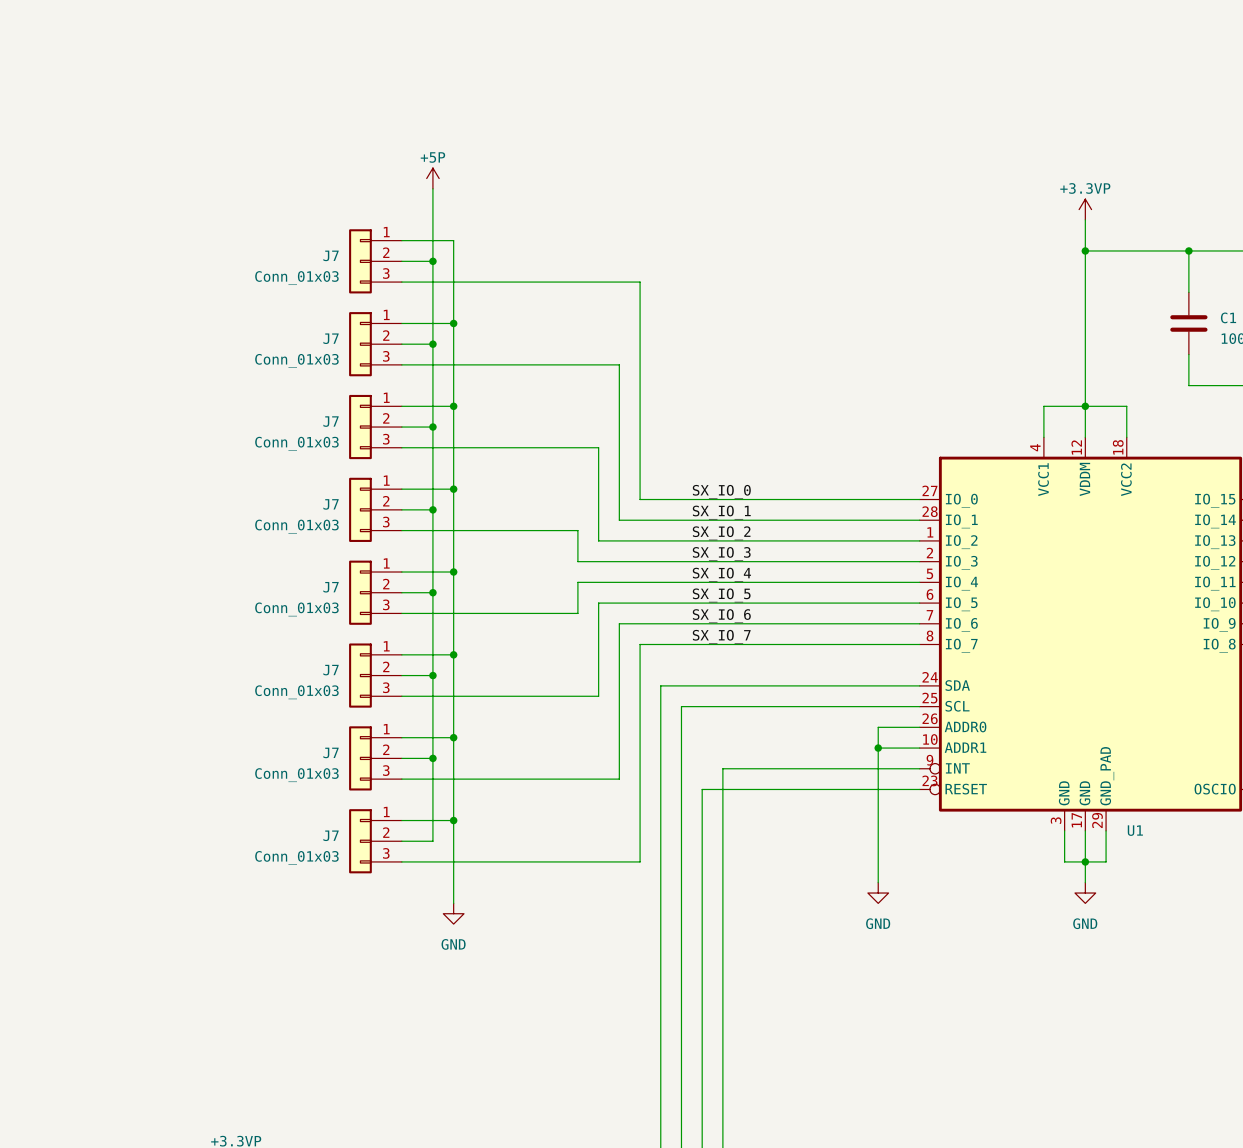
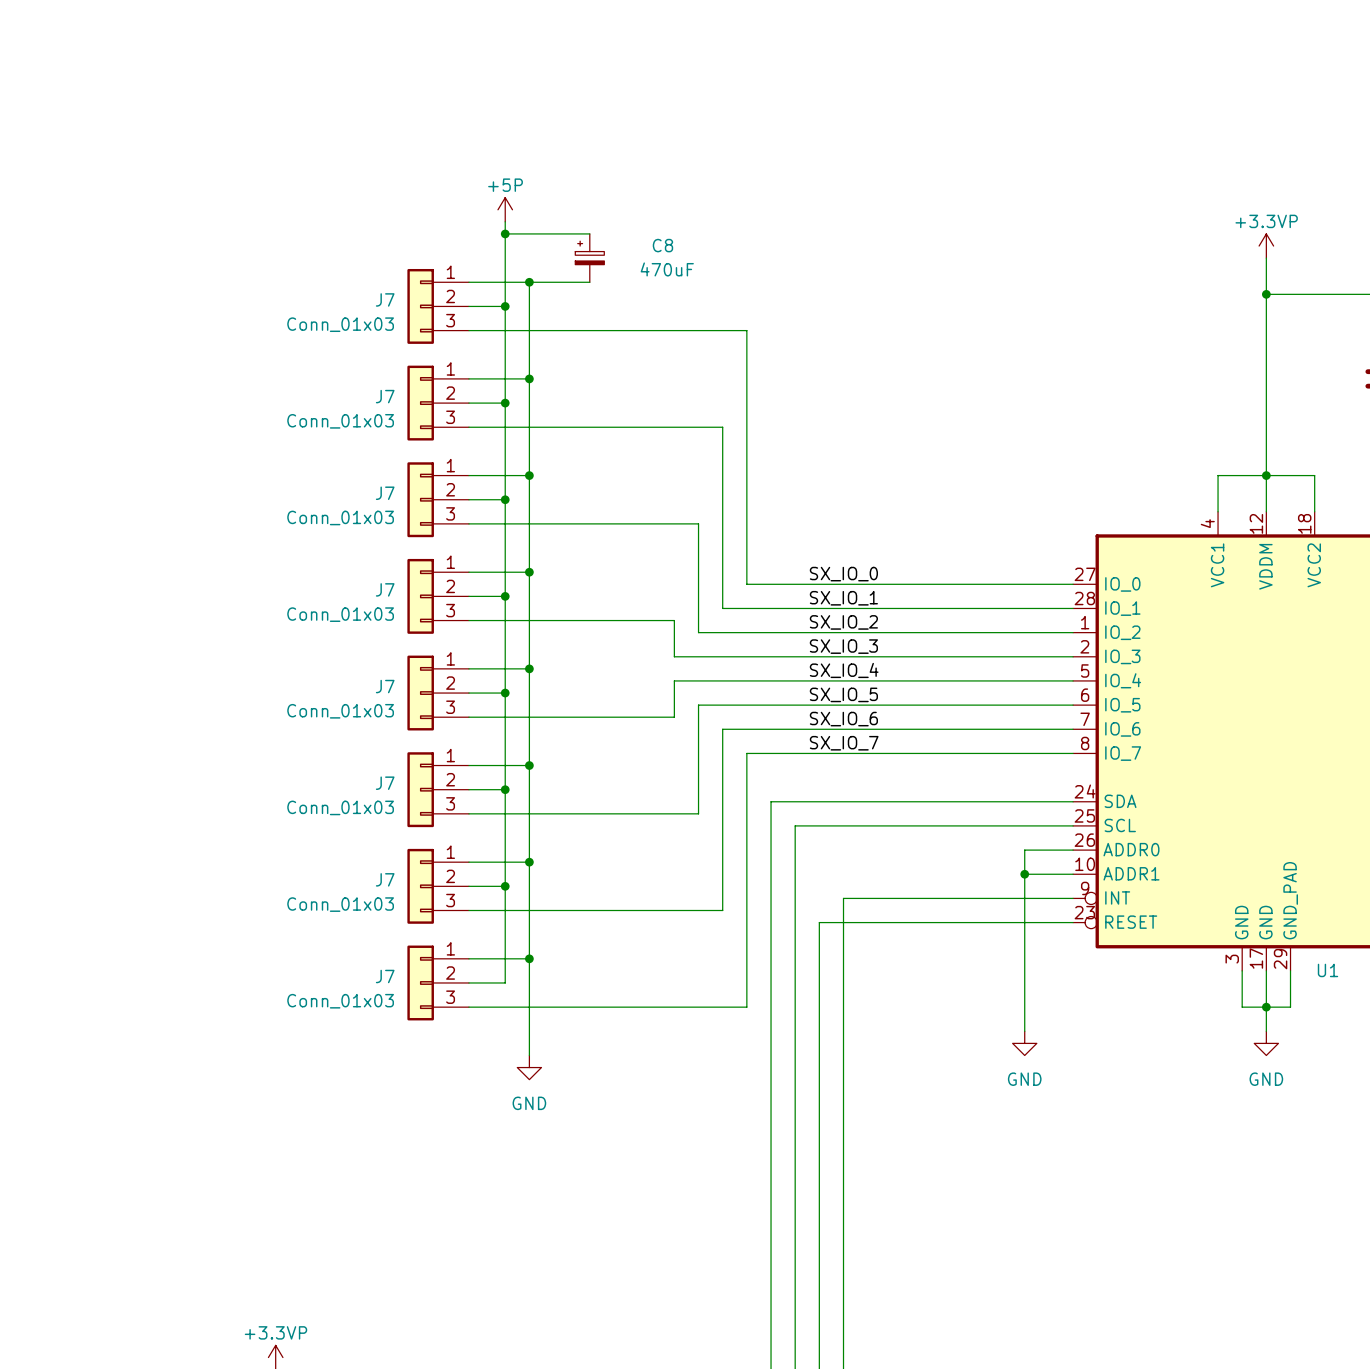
wire: none -> (505, 233) (589, 233)
junction: none -> (505, 233)
C8: none -> 470uF (589, 258)
wire: none -> (529, 282) (589, 282)
junction: none -> (529, 282)

